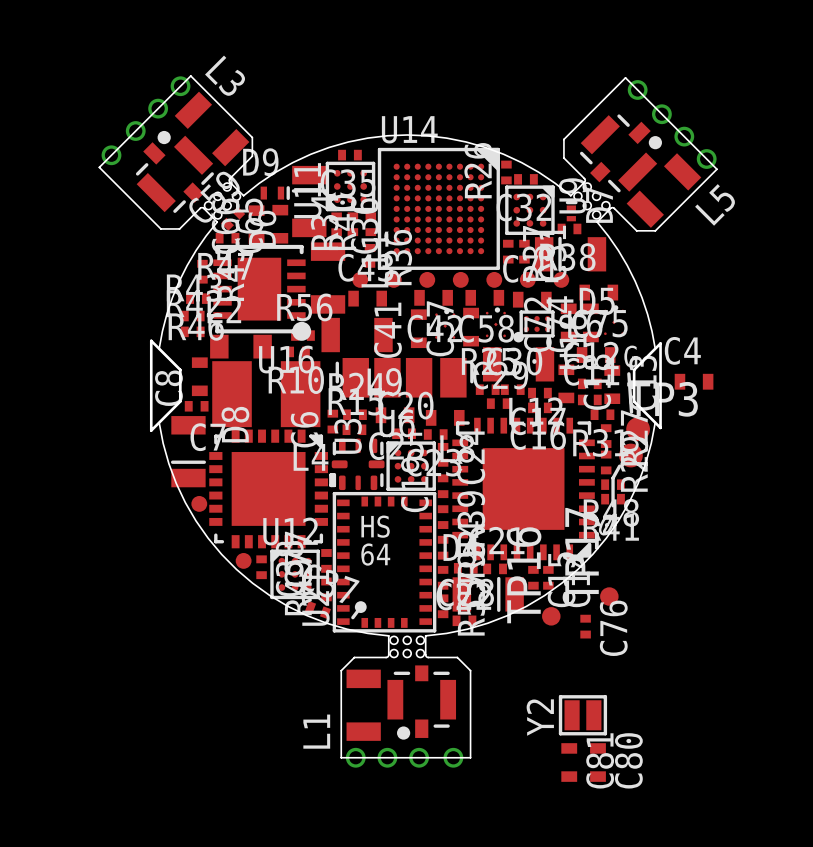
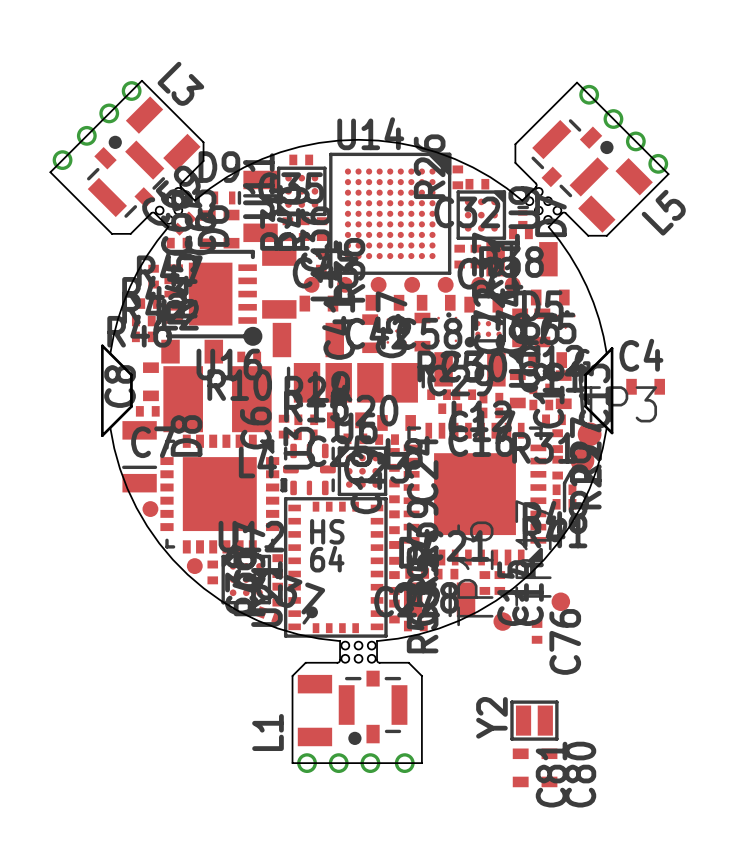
R56: (302, 335) -> none

